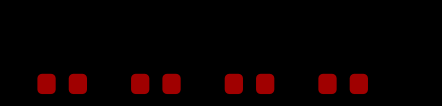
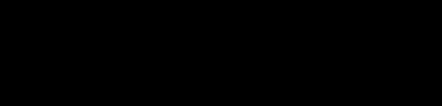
part: (62, 83) -> none
part: (155, 83) -> none
part: (249, 83) -> none
part: (343, 83) -> none

